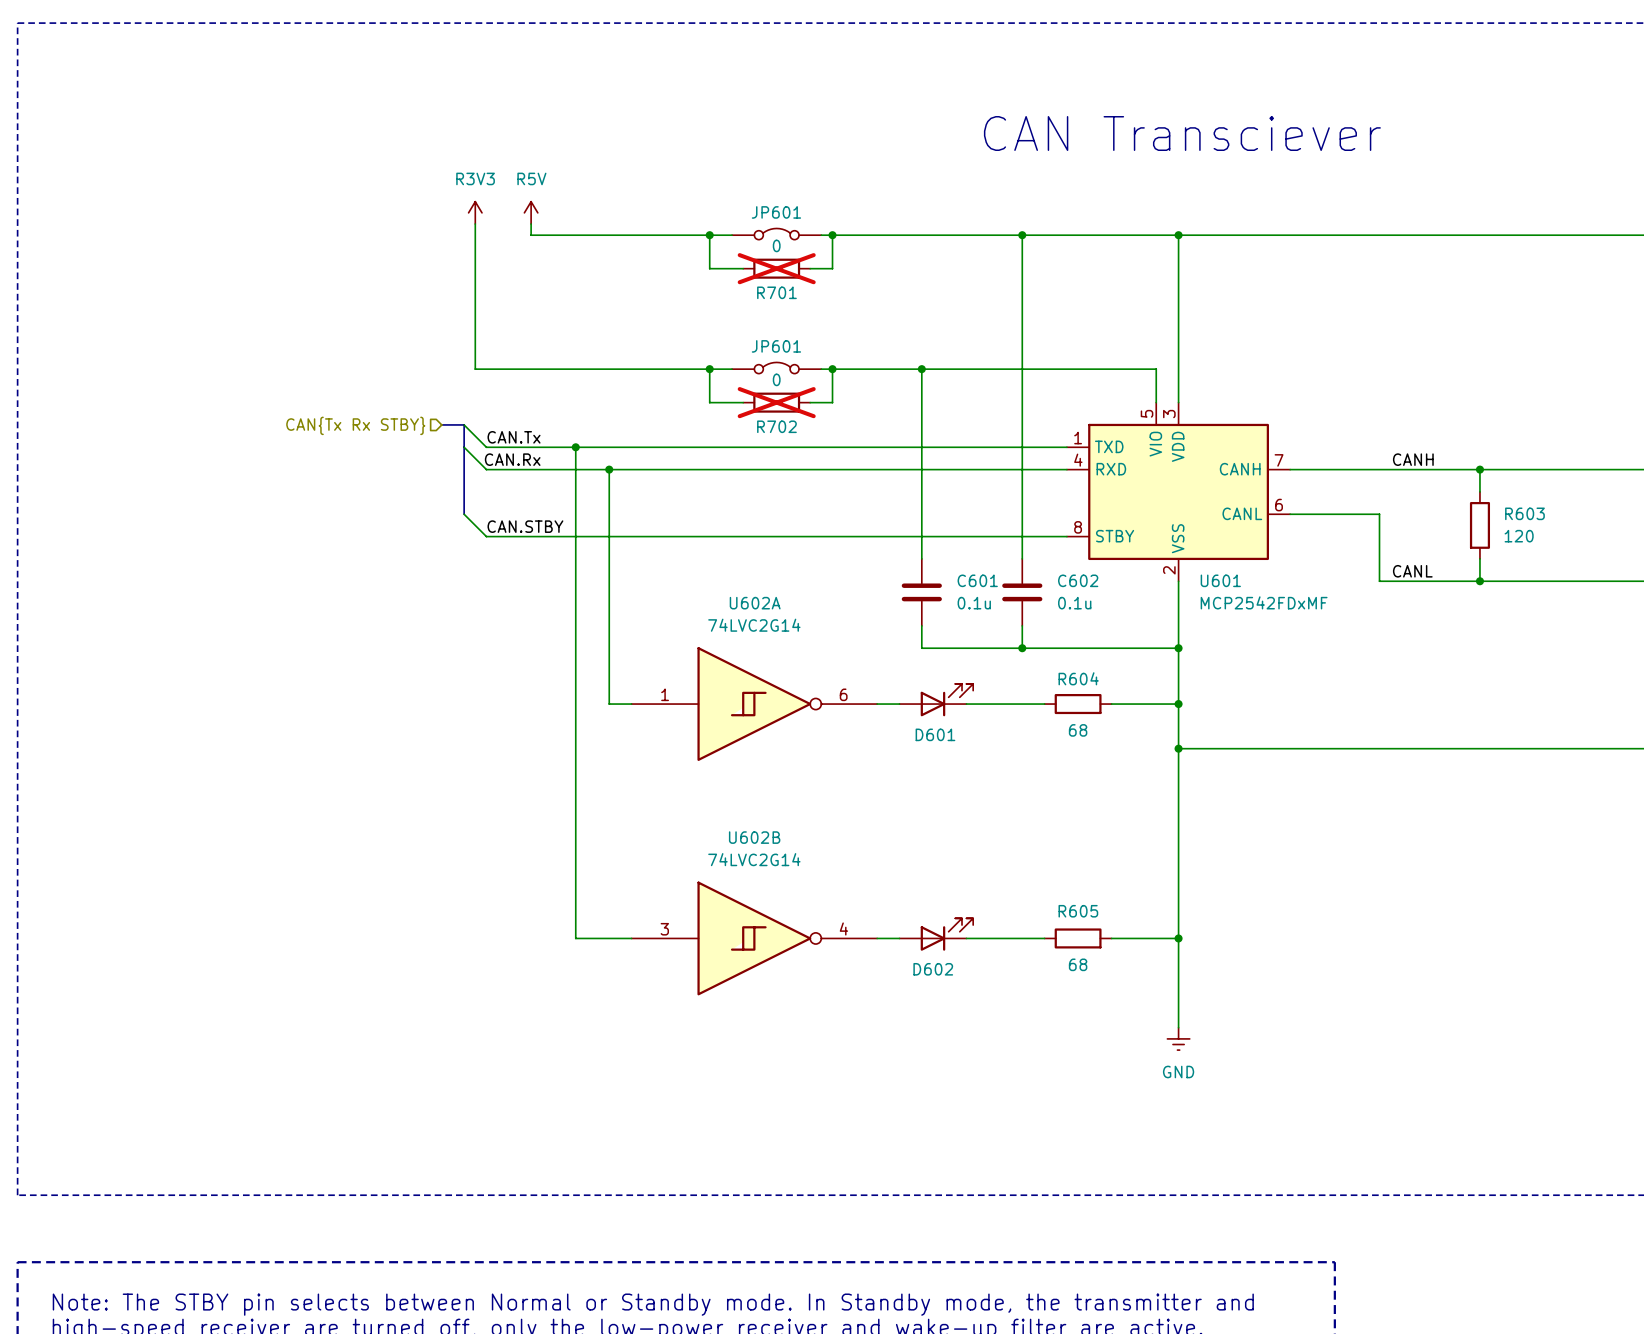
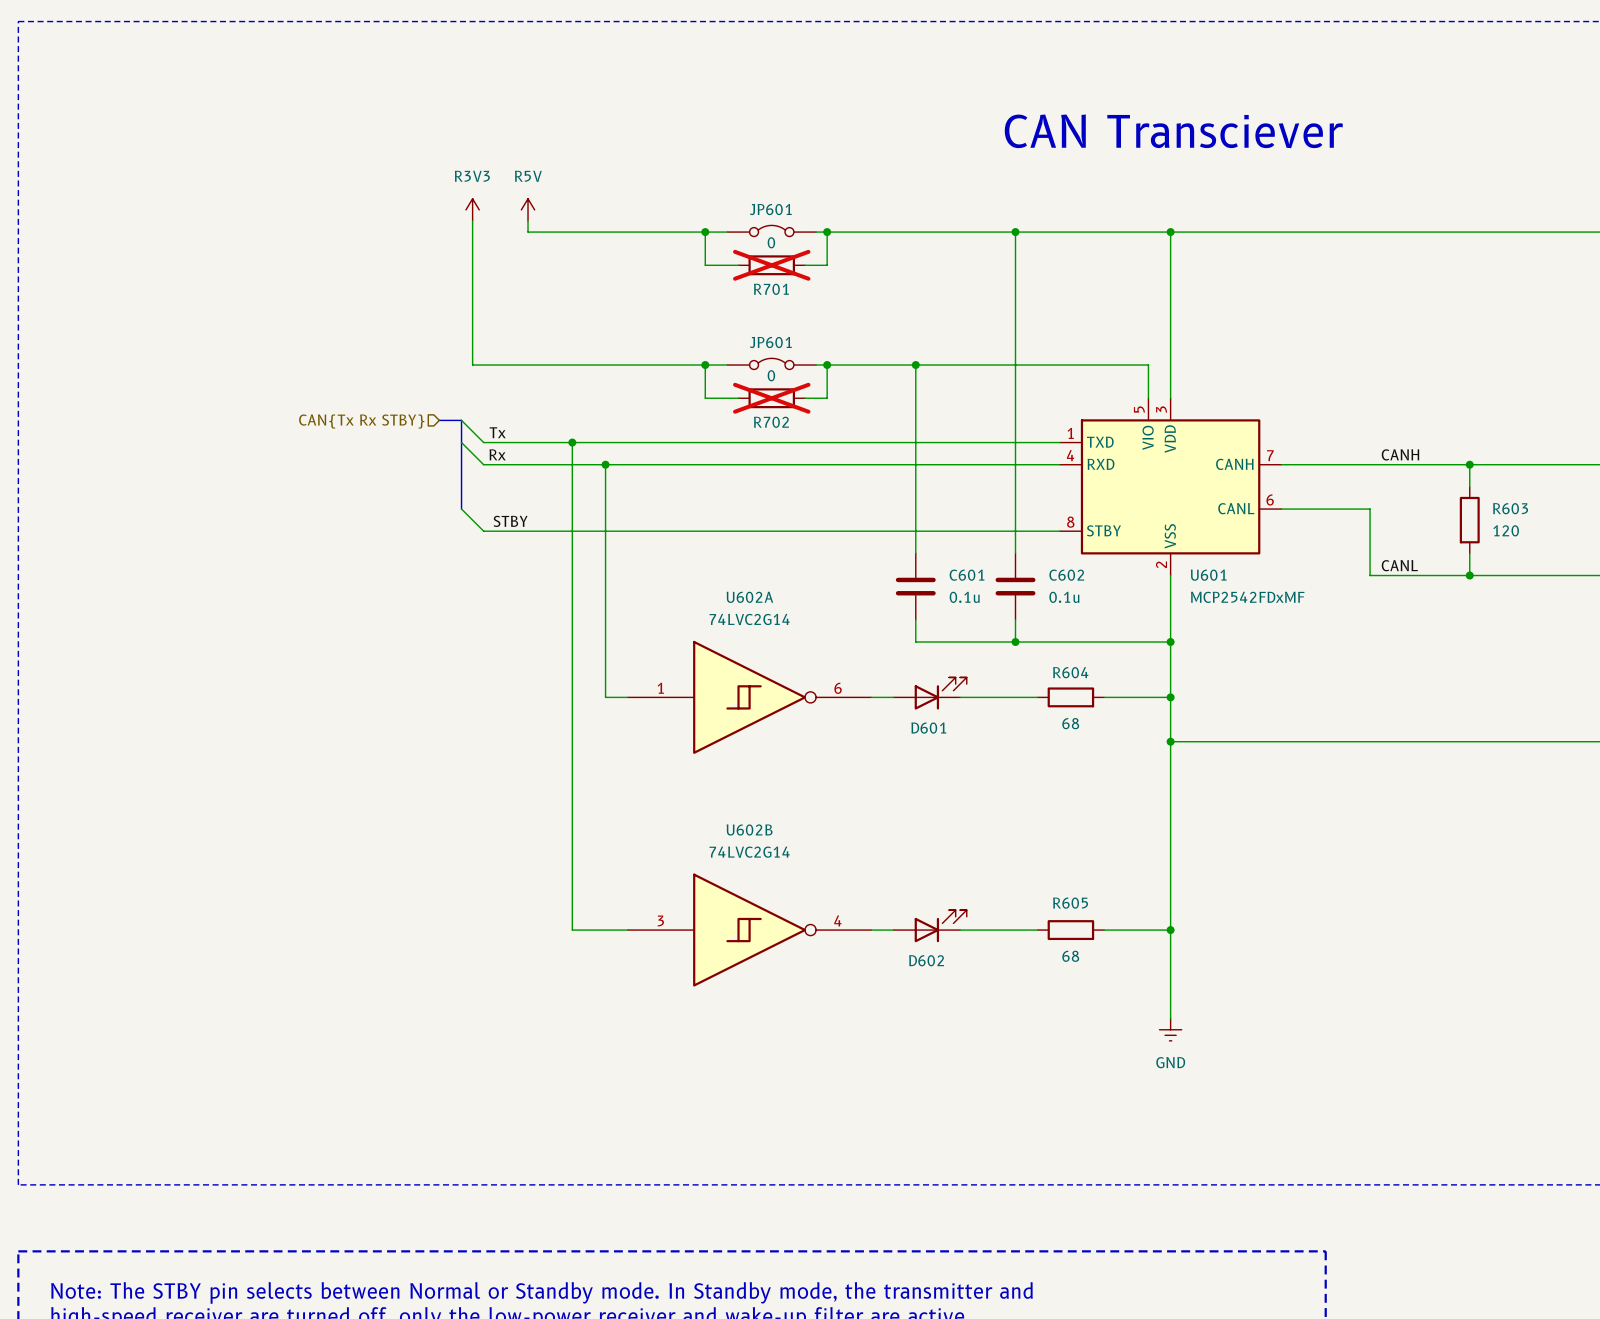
label: none -> Tx (497, 432)
label: CAN.Tx (514, 437) -> none
label: none -> Rx (497, 454)
label: CAN.Rx (512, 459) -> none
label: CAN.STBY (525, 526) -> STBY (510, 521)

